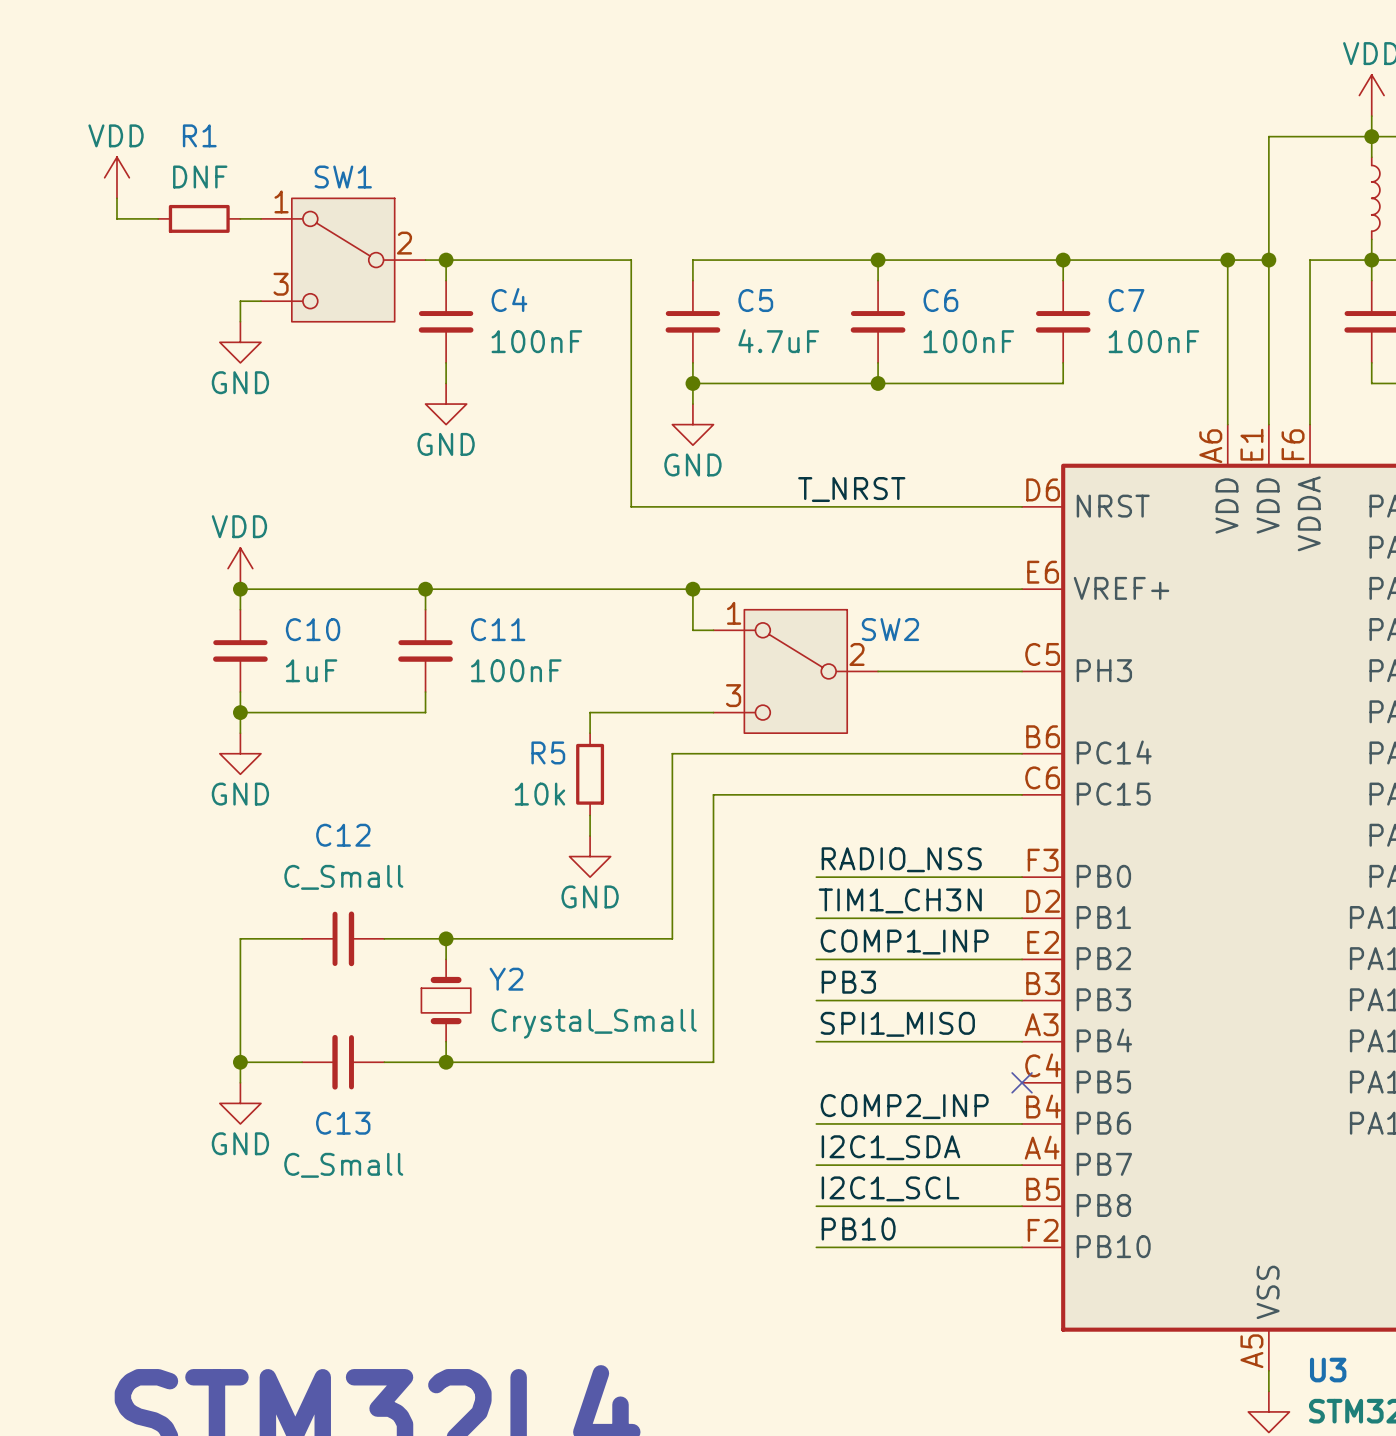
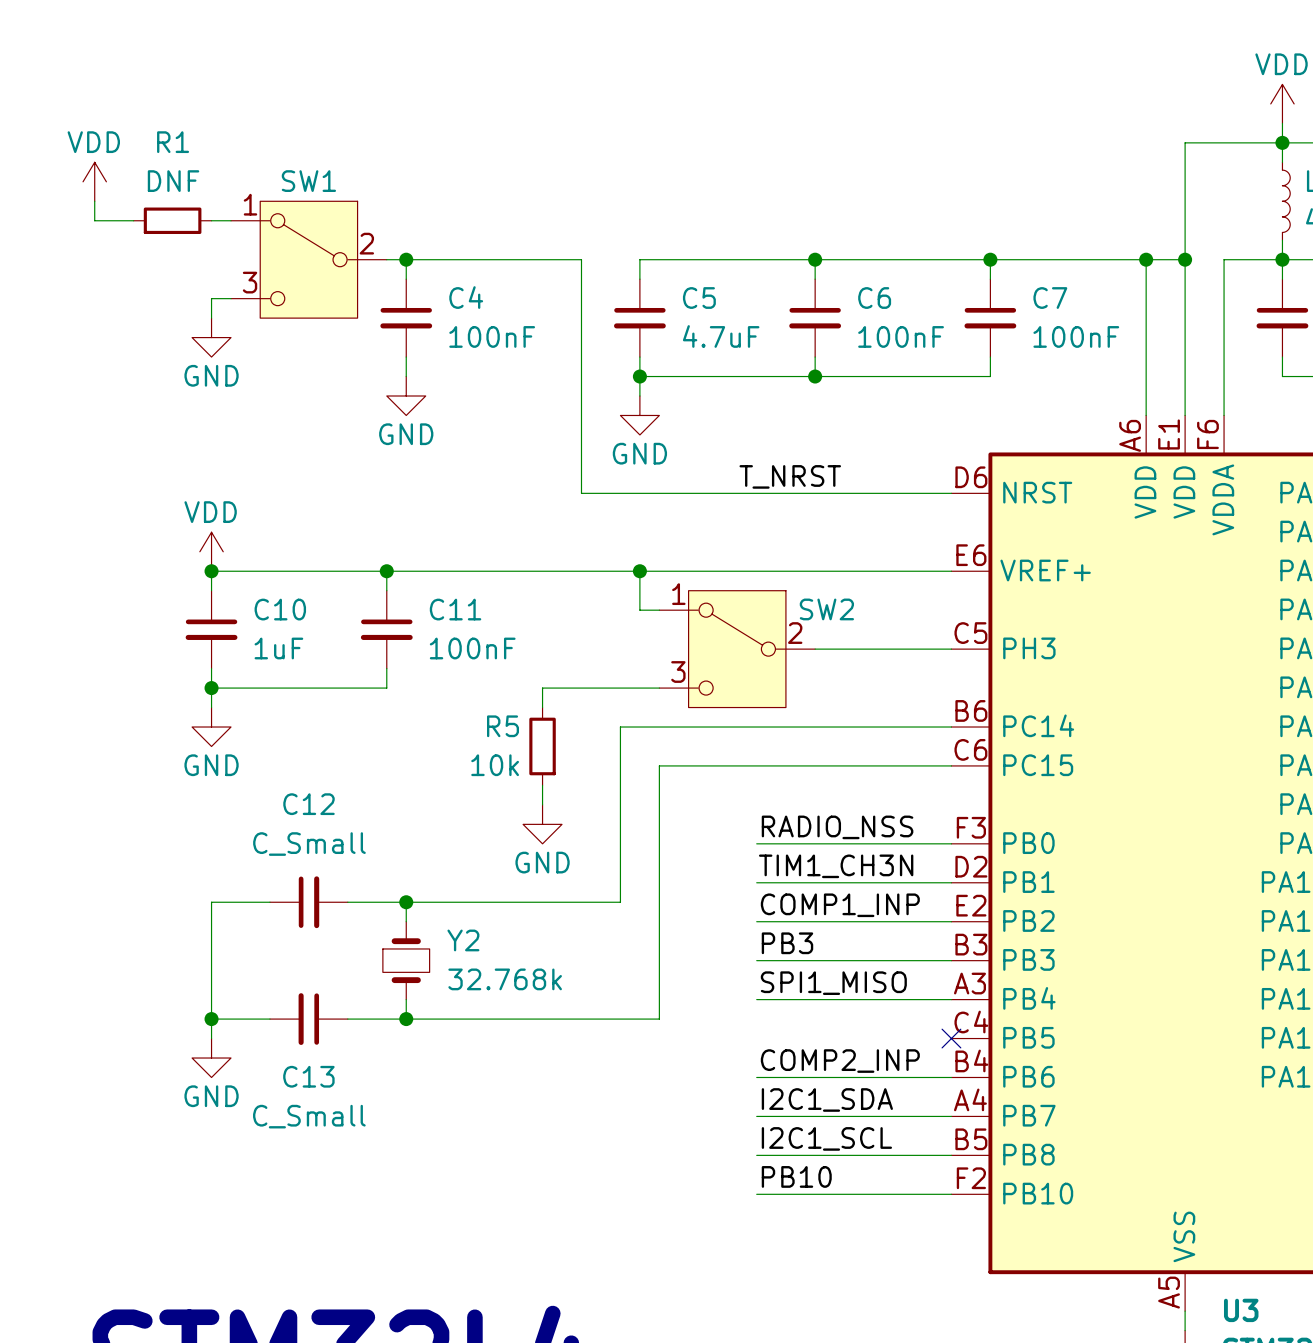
Y2 value: Crystal_Small (594, 1023) -> 32.768k (505, 979)

